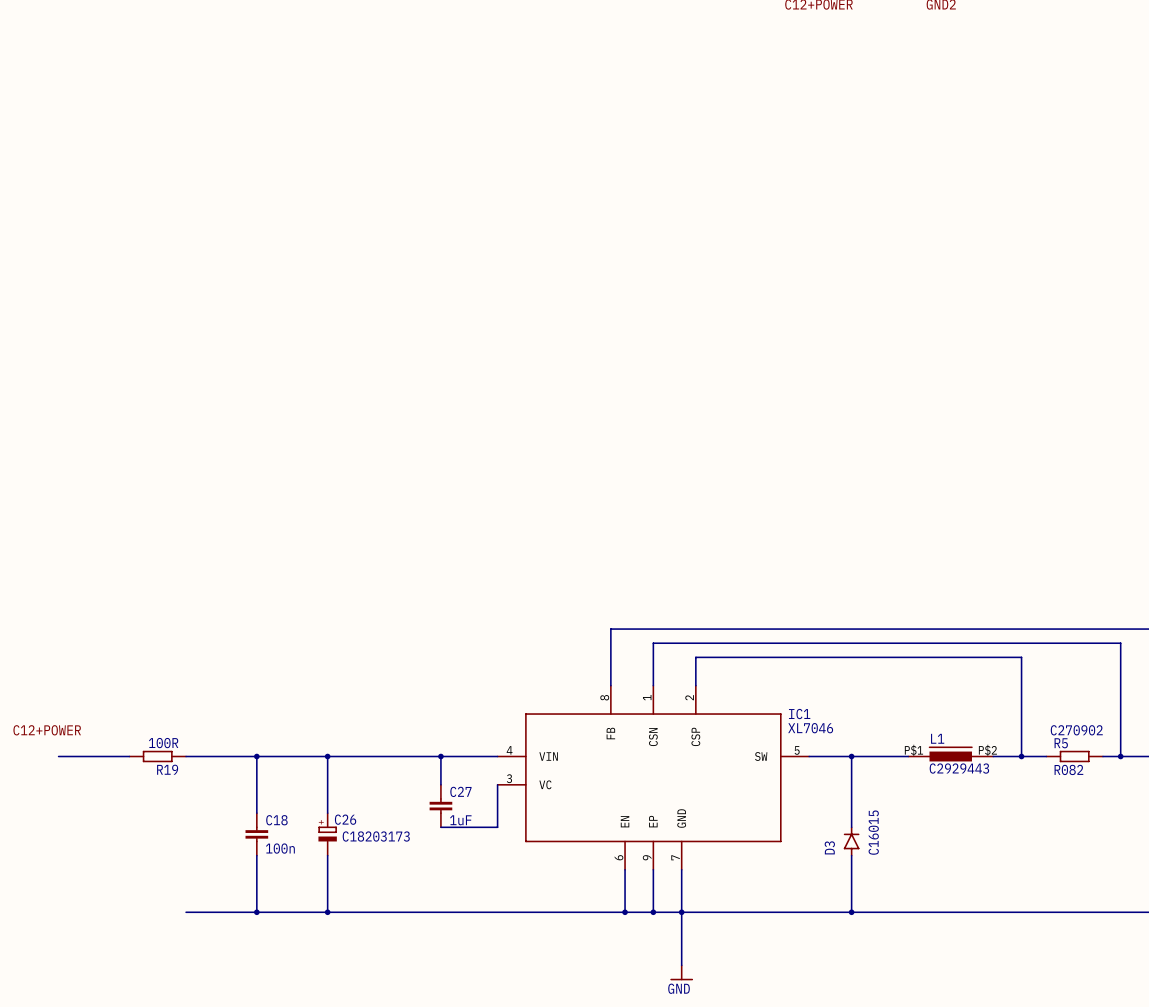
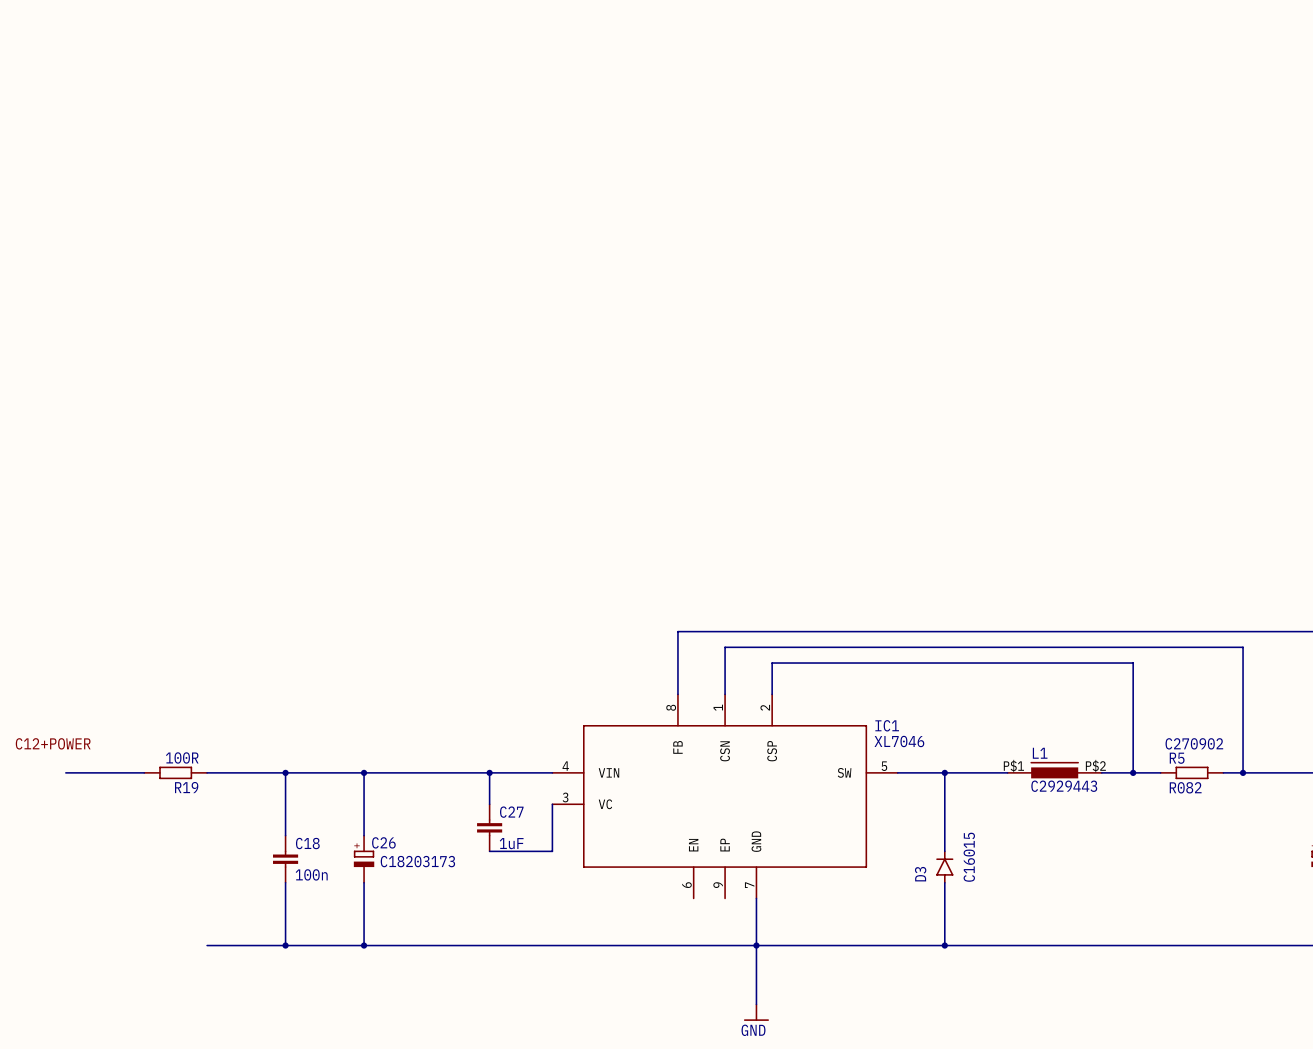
wire: (625, 869) (625, 912) -> none
wire: (653, 869) (653, 912) -> none
junction: (625, 912) -> none
junction: (653, 912) -> none

